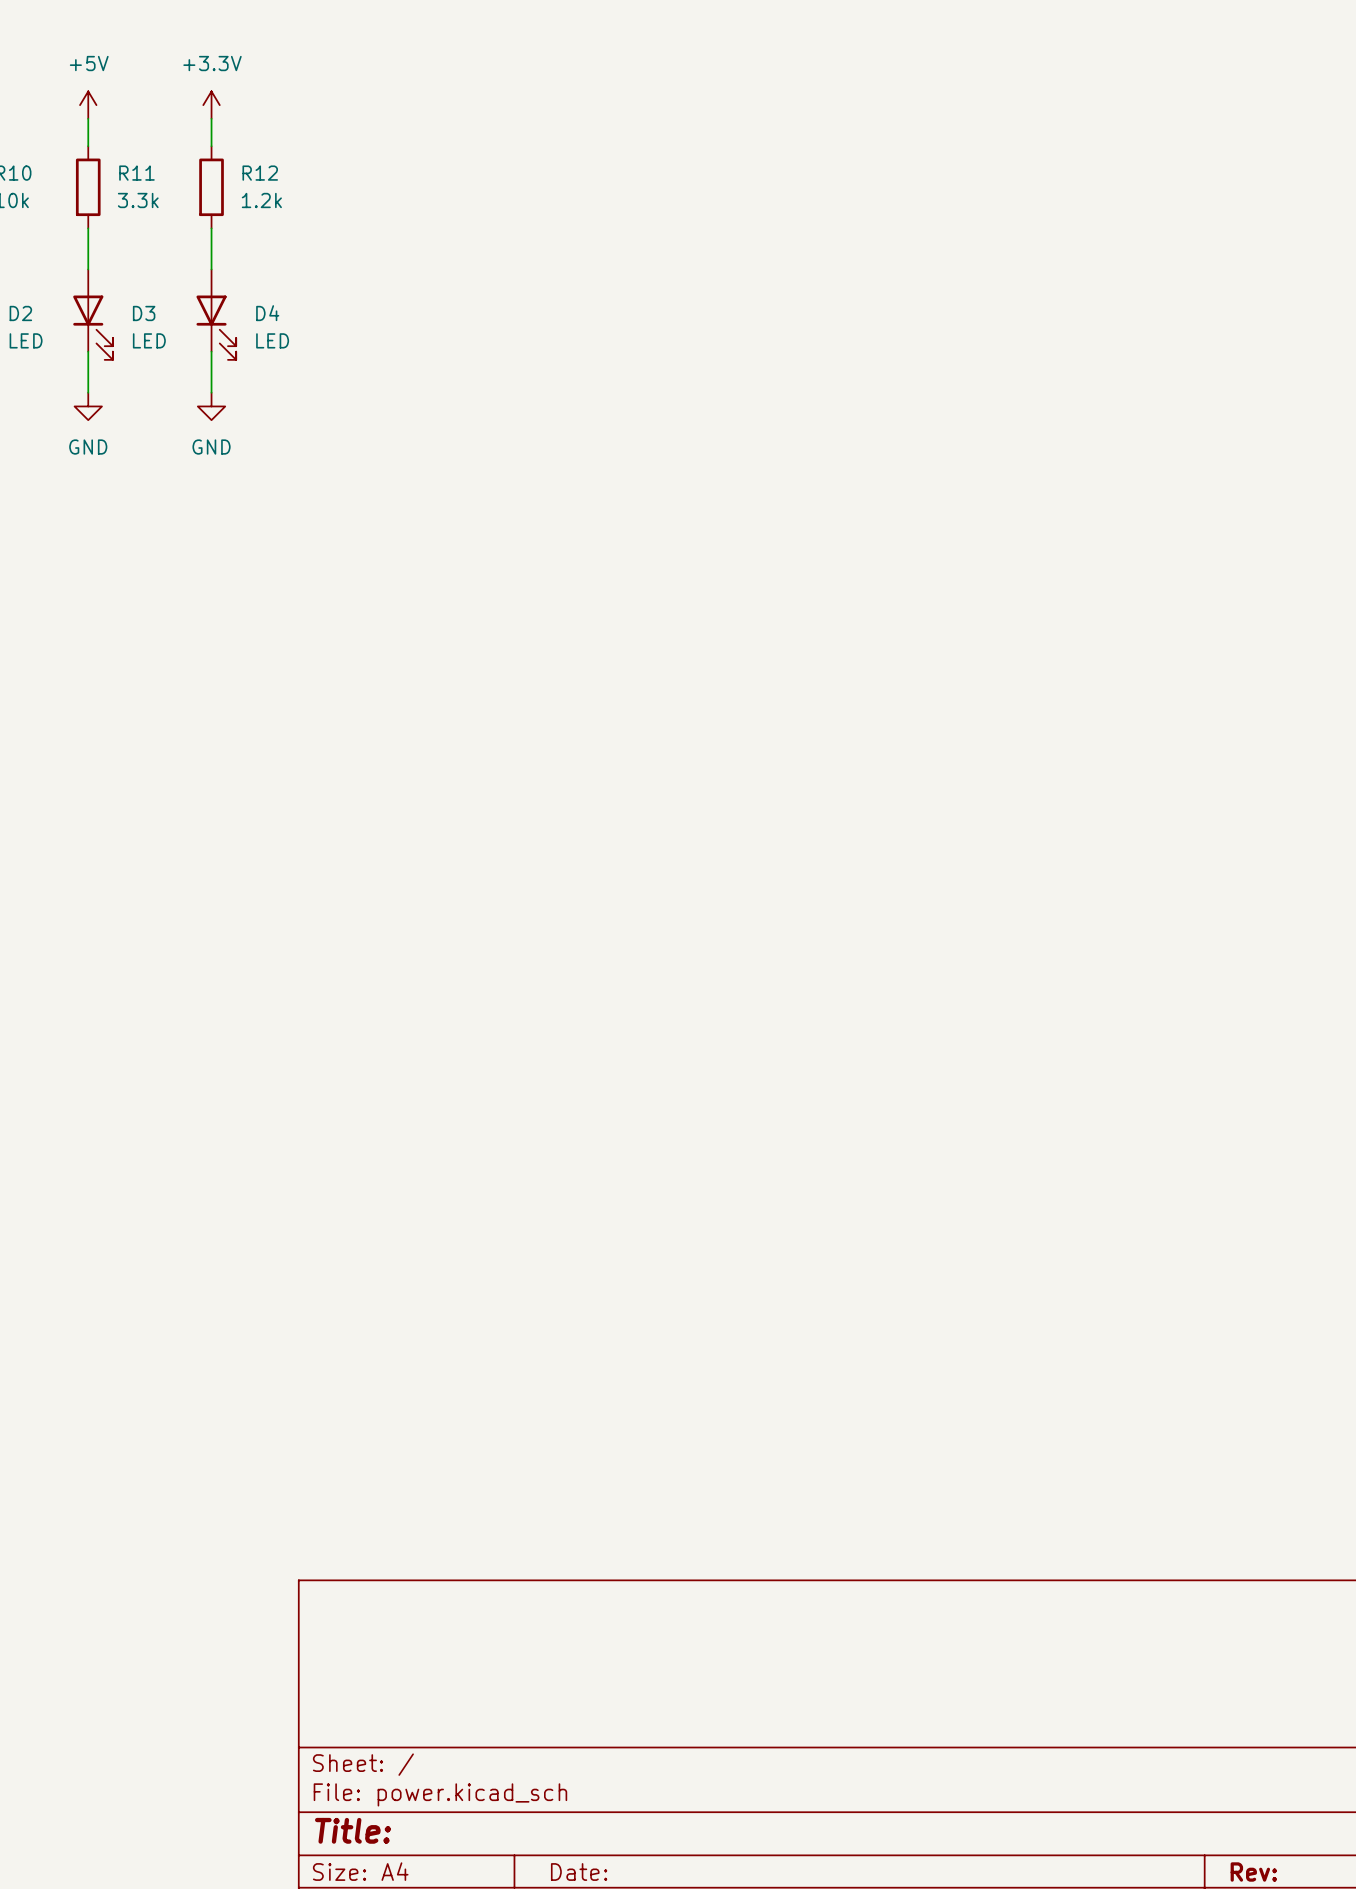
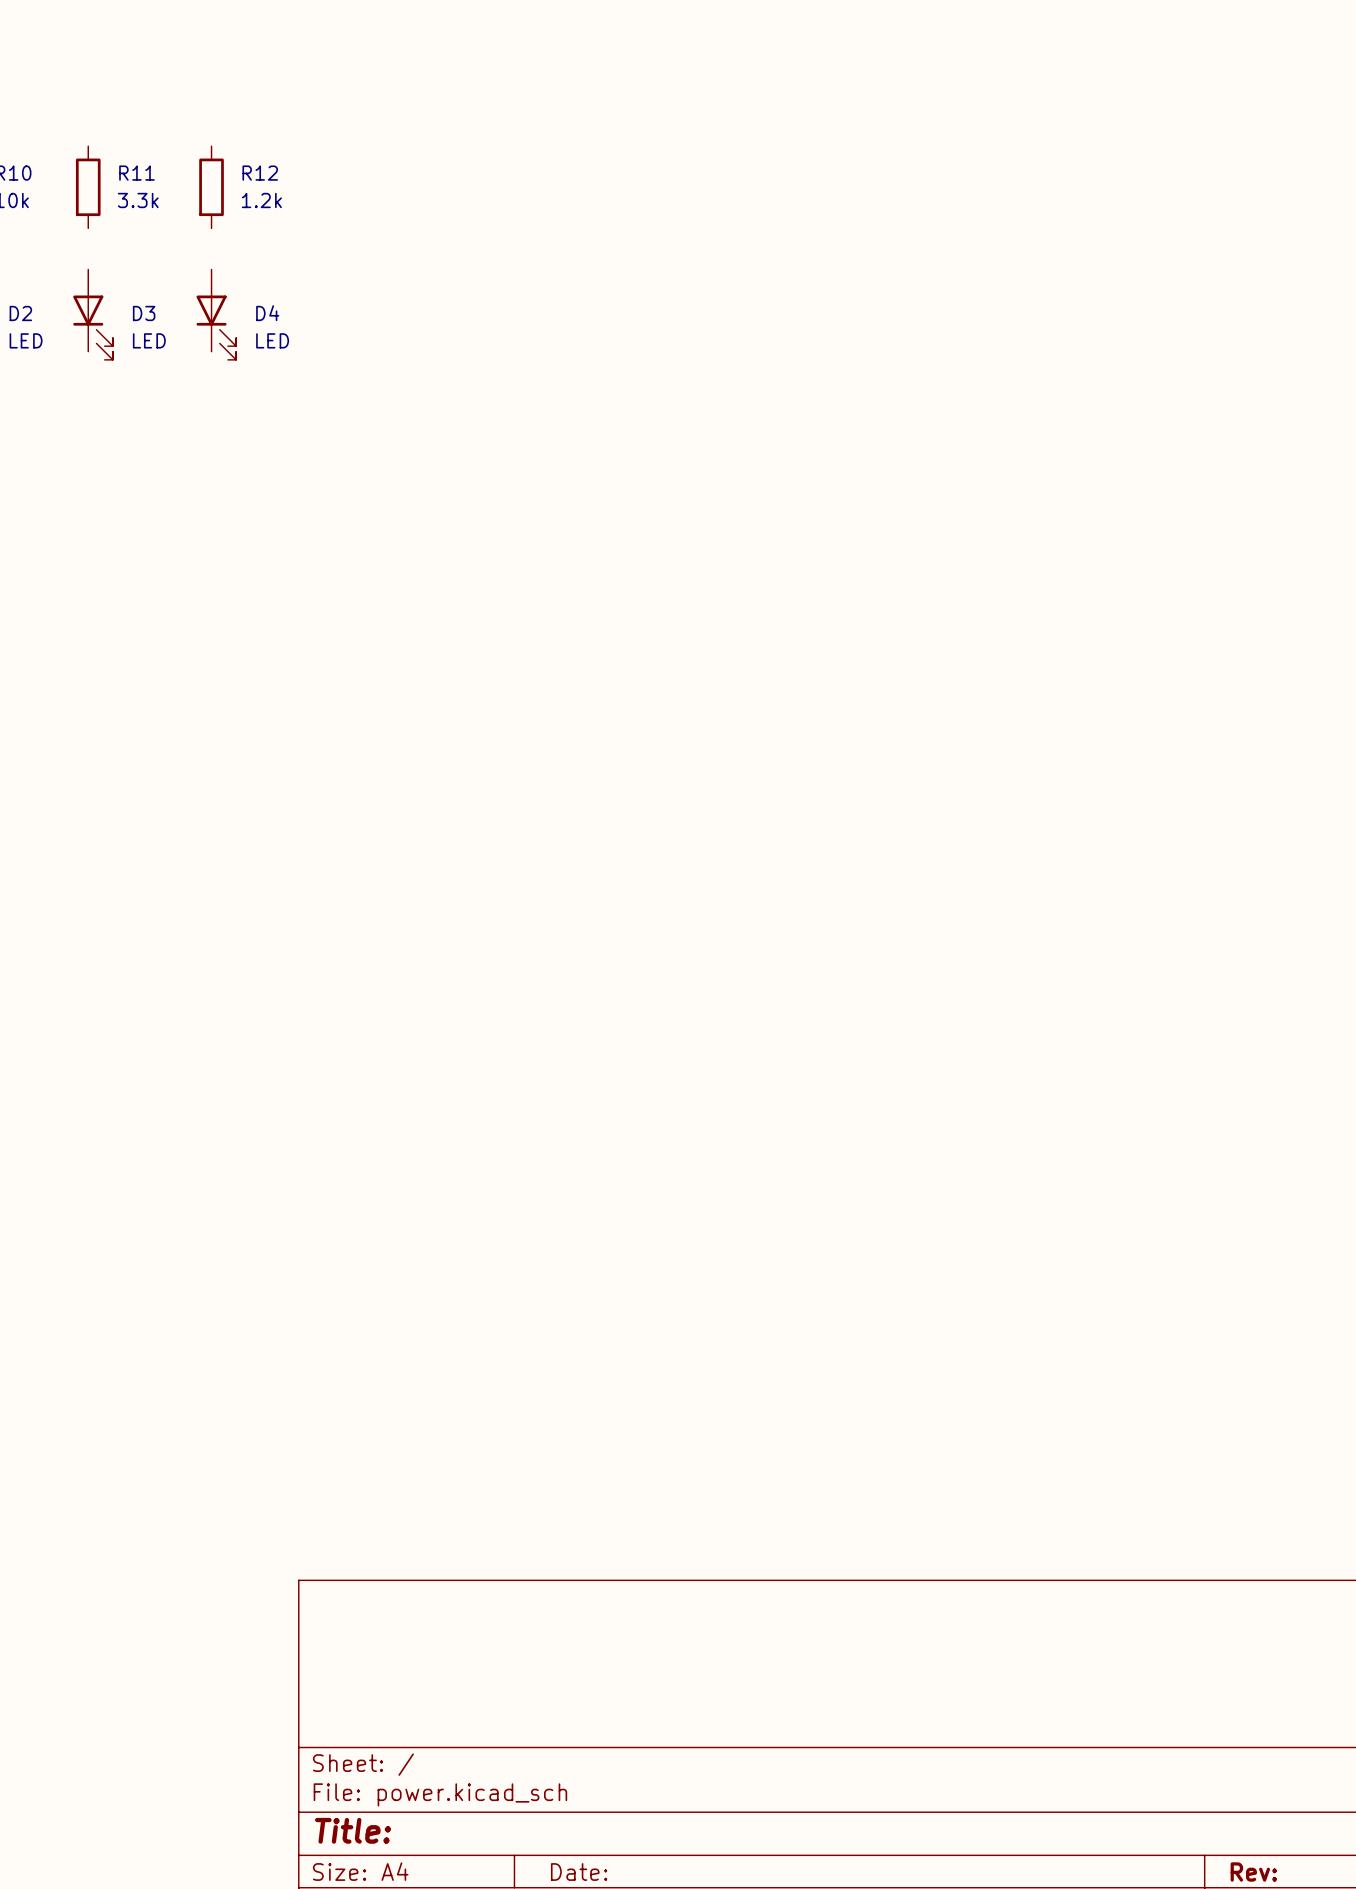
power symbol: +5V (88, 105) -> none
power symbol: +3.3V (211, 105) -> none
wire: (88, 118) (88, 146) -> none
wire: (211, 118) (211, 146) -> none
wire: (88, 228) (88, 269) -> none
wire: (211, 228) (211, 269) -> none
wire: (88, 351) (88, 392) -> none
wire: (211, 351) (211, 392) -> none
power symbol: GND (88, 406) -> none
power symbol: GND (211, 406) -> none

